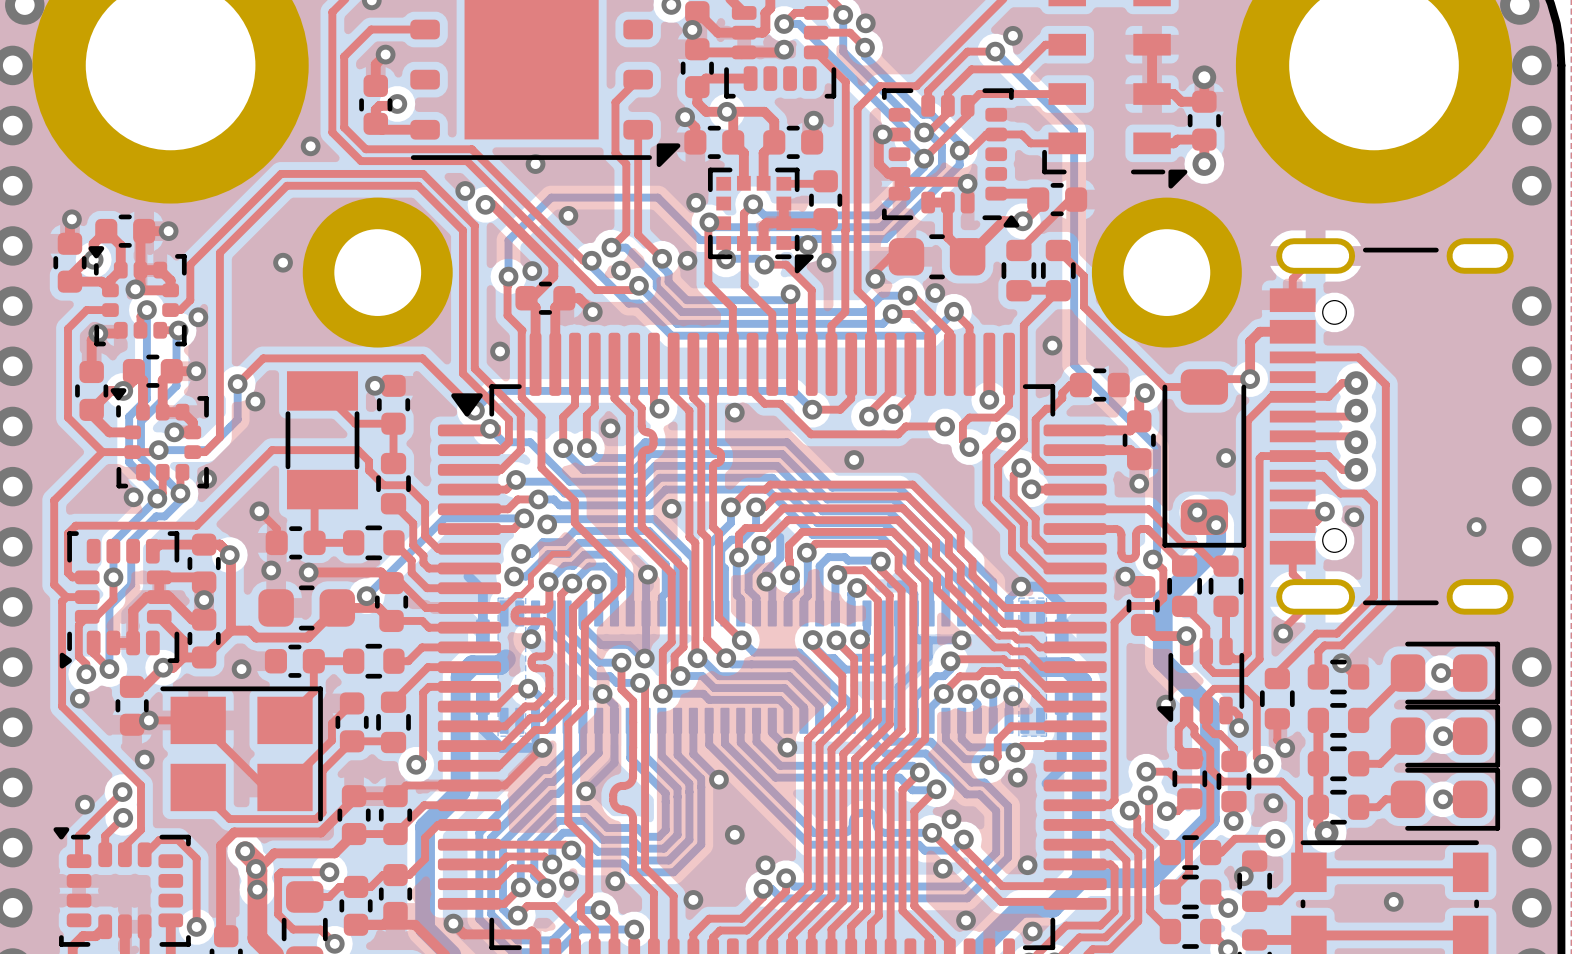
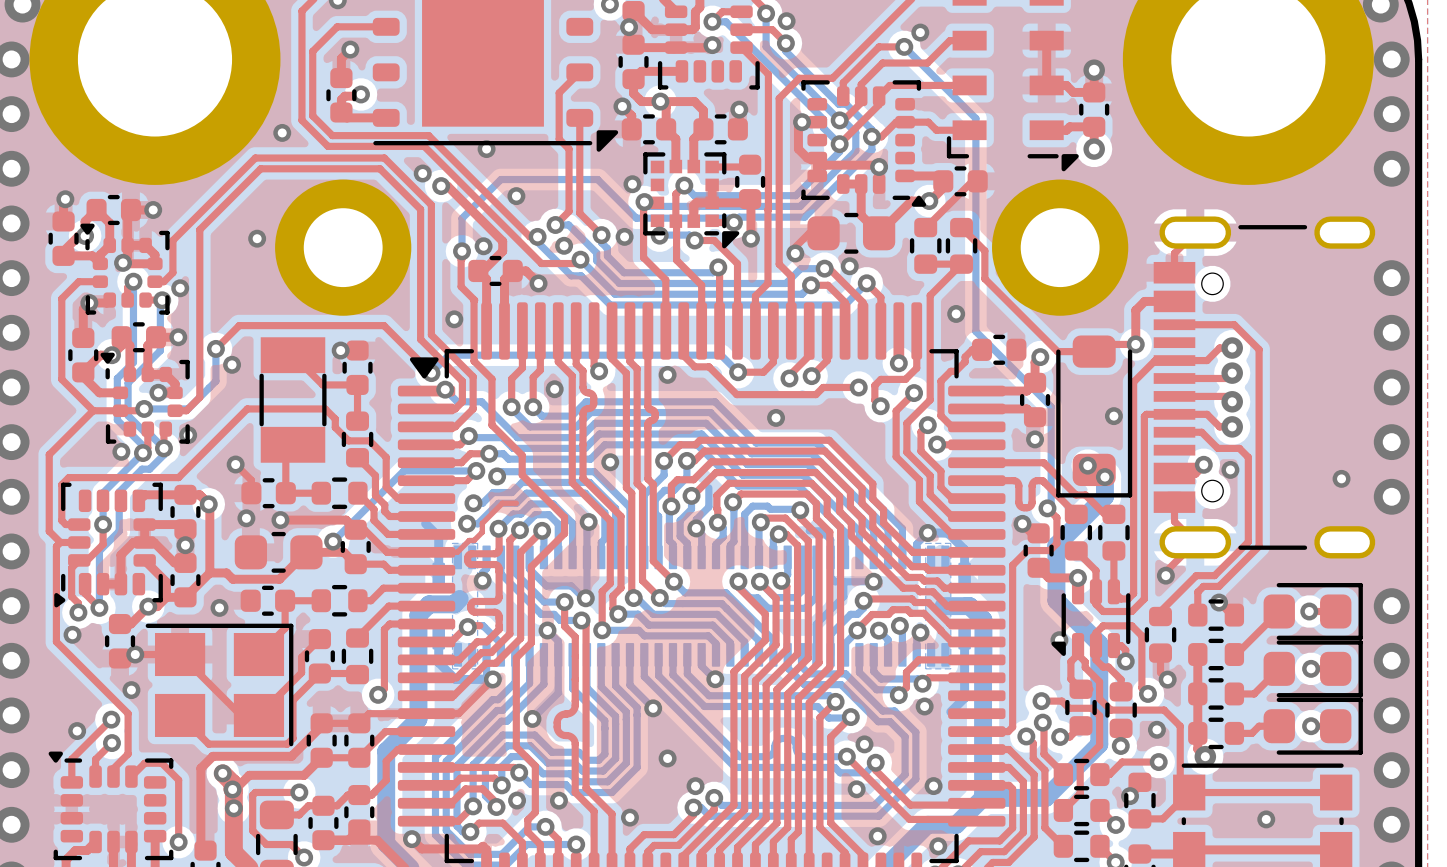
top track: (549, 651) (546, 656) (534, 656) (531, 661) (534, 667) (547, 669) (549, 678) -> (499, 592) (496, 601) (474, 601) (470, 605) (473, 611) (495, 612) (499, 616)
via position: (528, 688) -> (467, 627)

